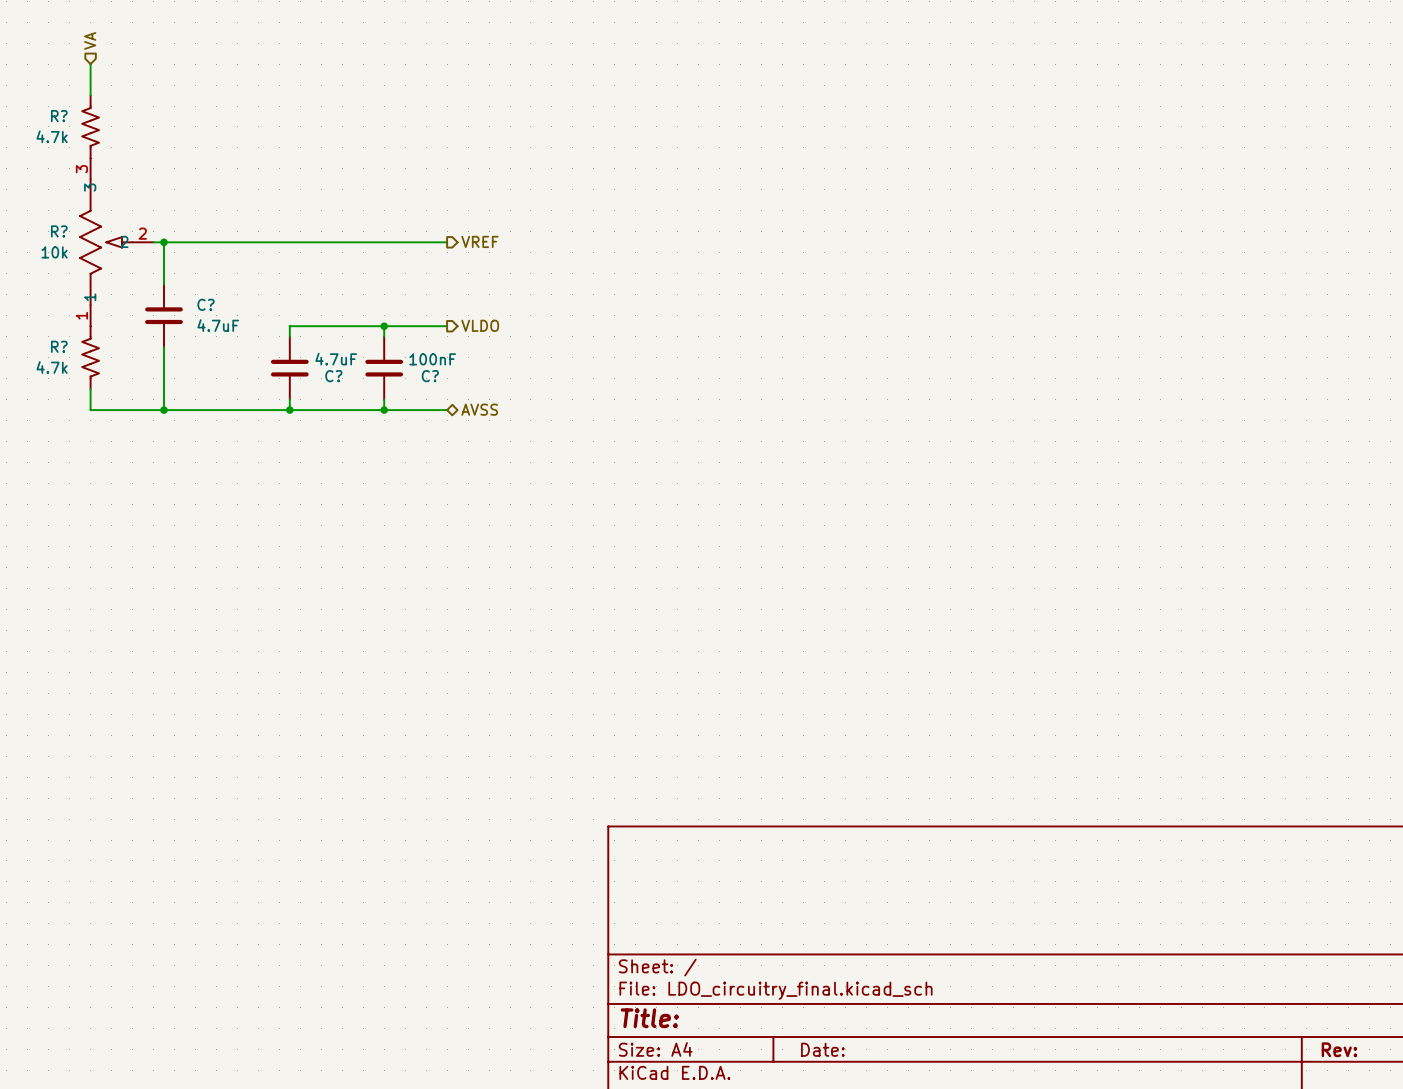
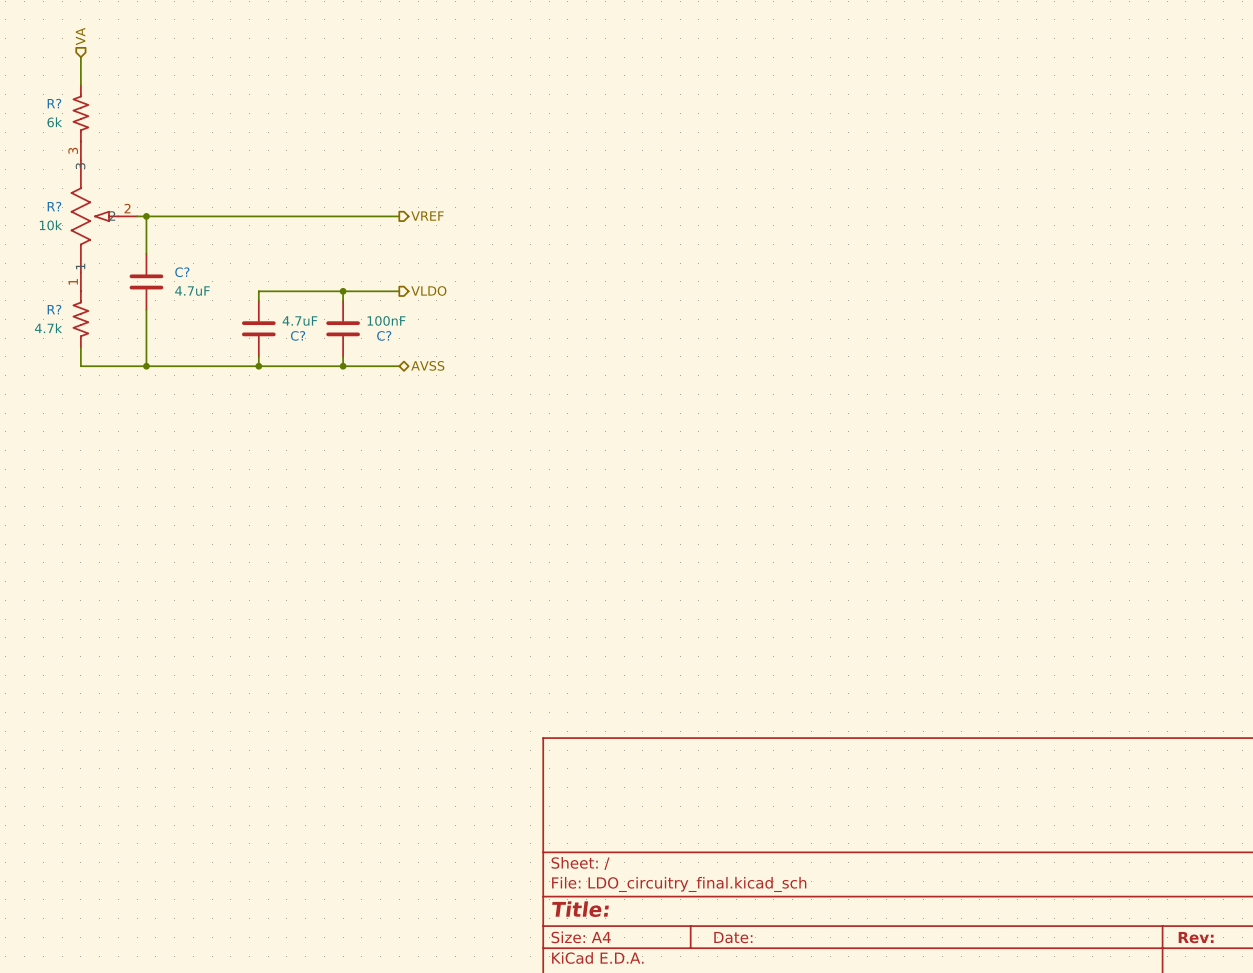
R? value: 4.7k (52, 136) -> 6k (54, 122)

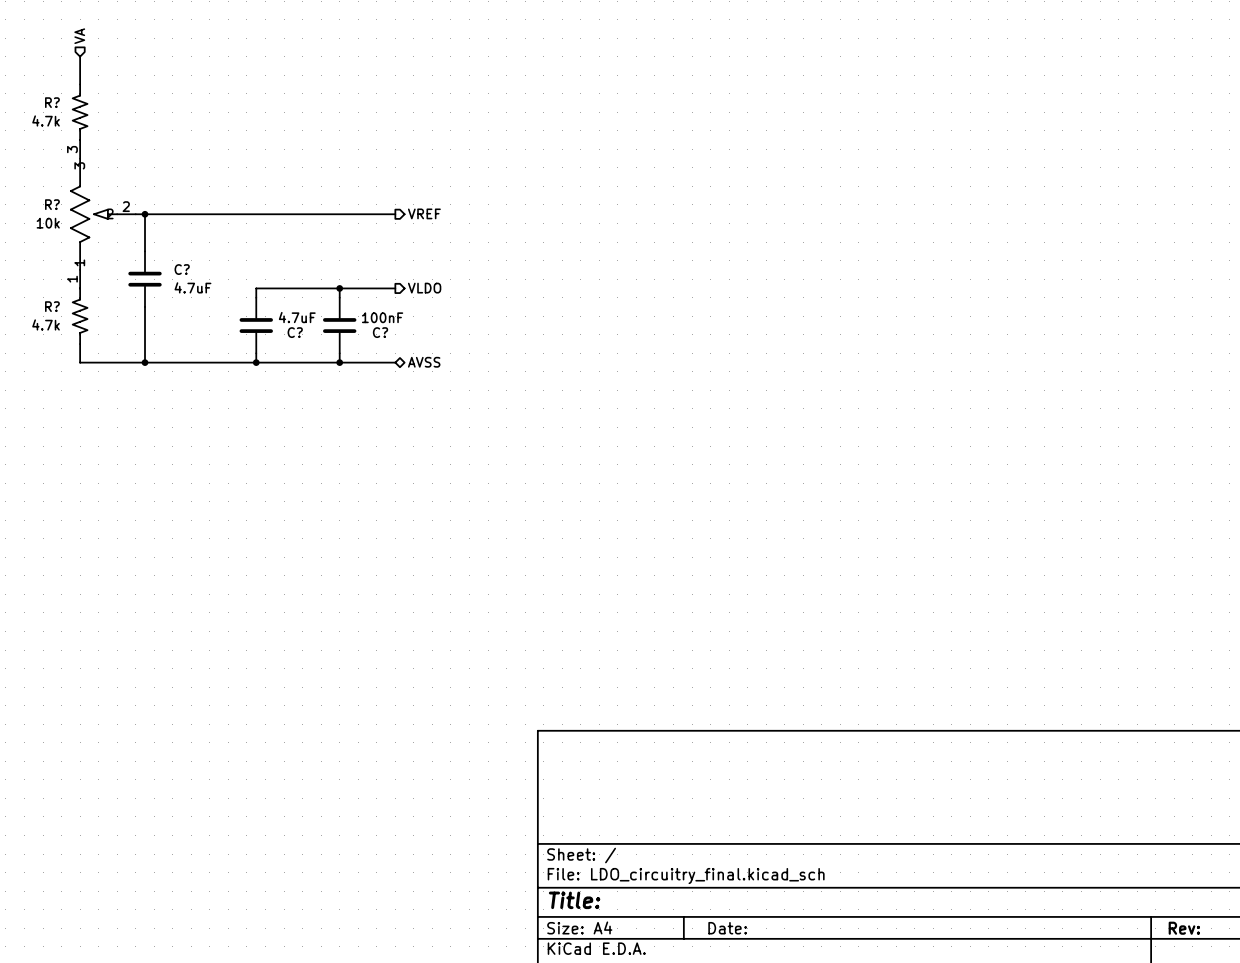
R? value: 6k (54, 122) -> 4.7k (46, 120)

